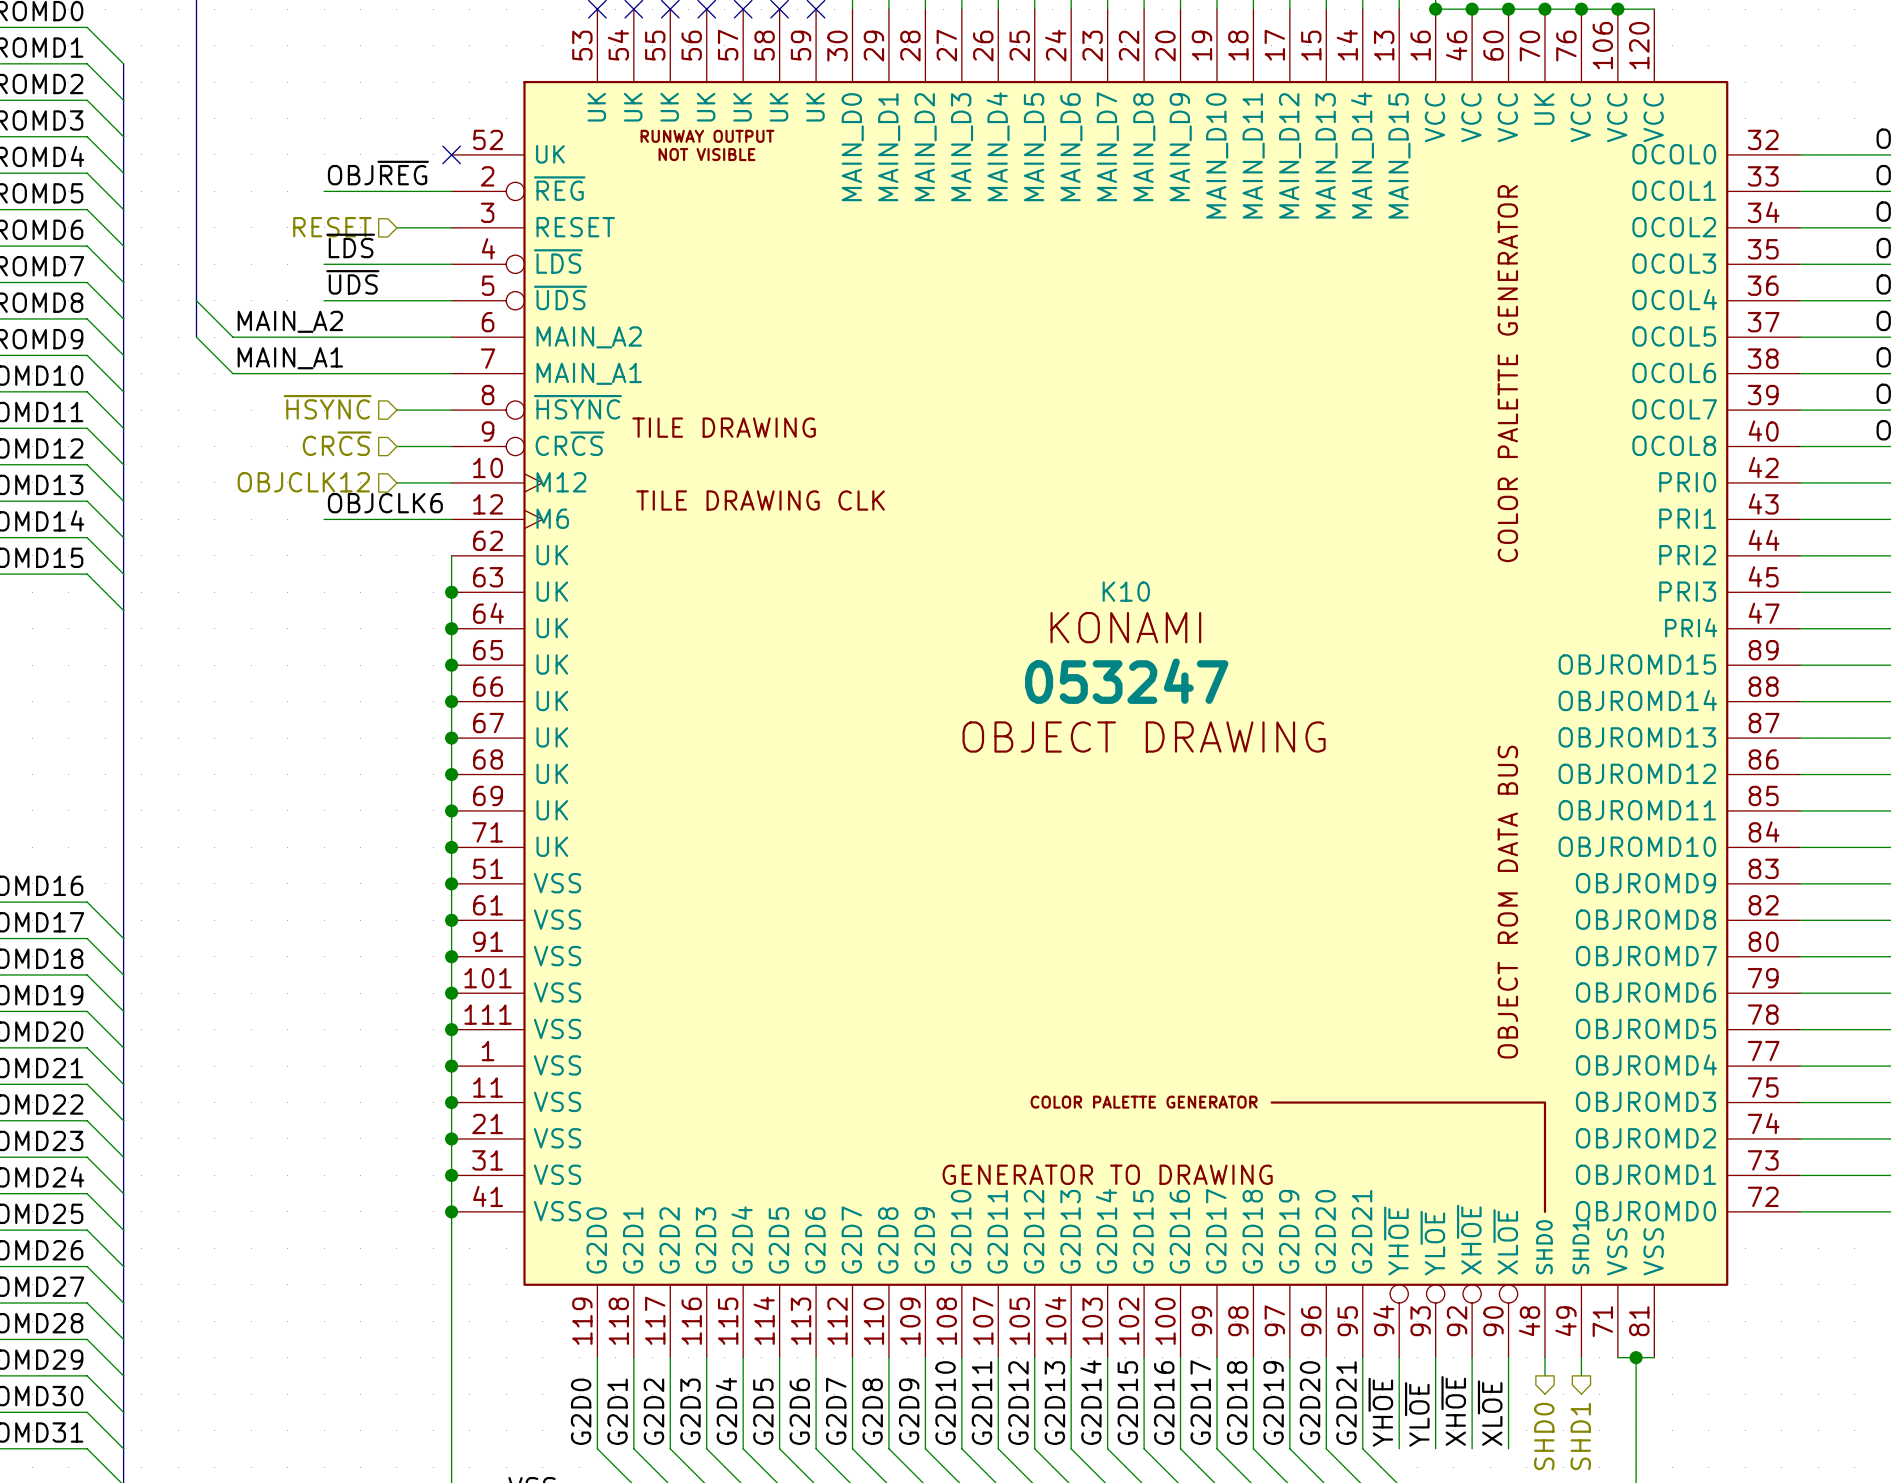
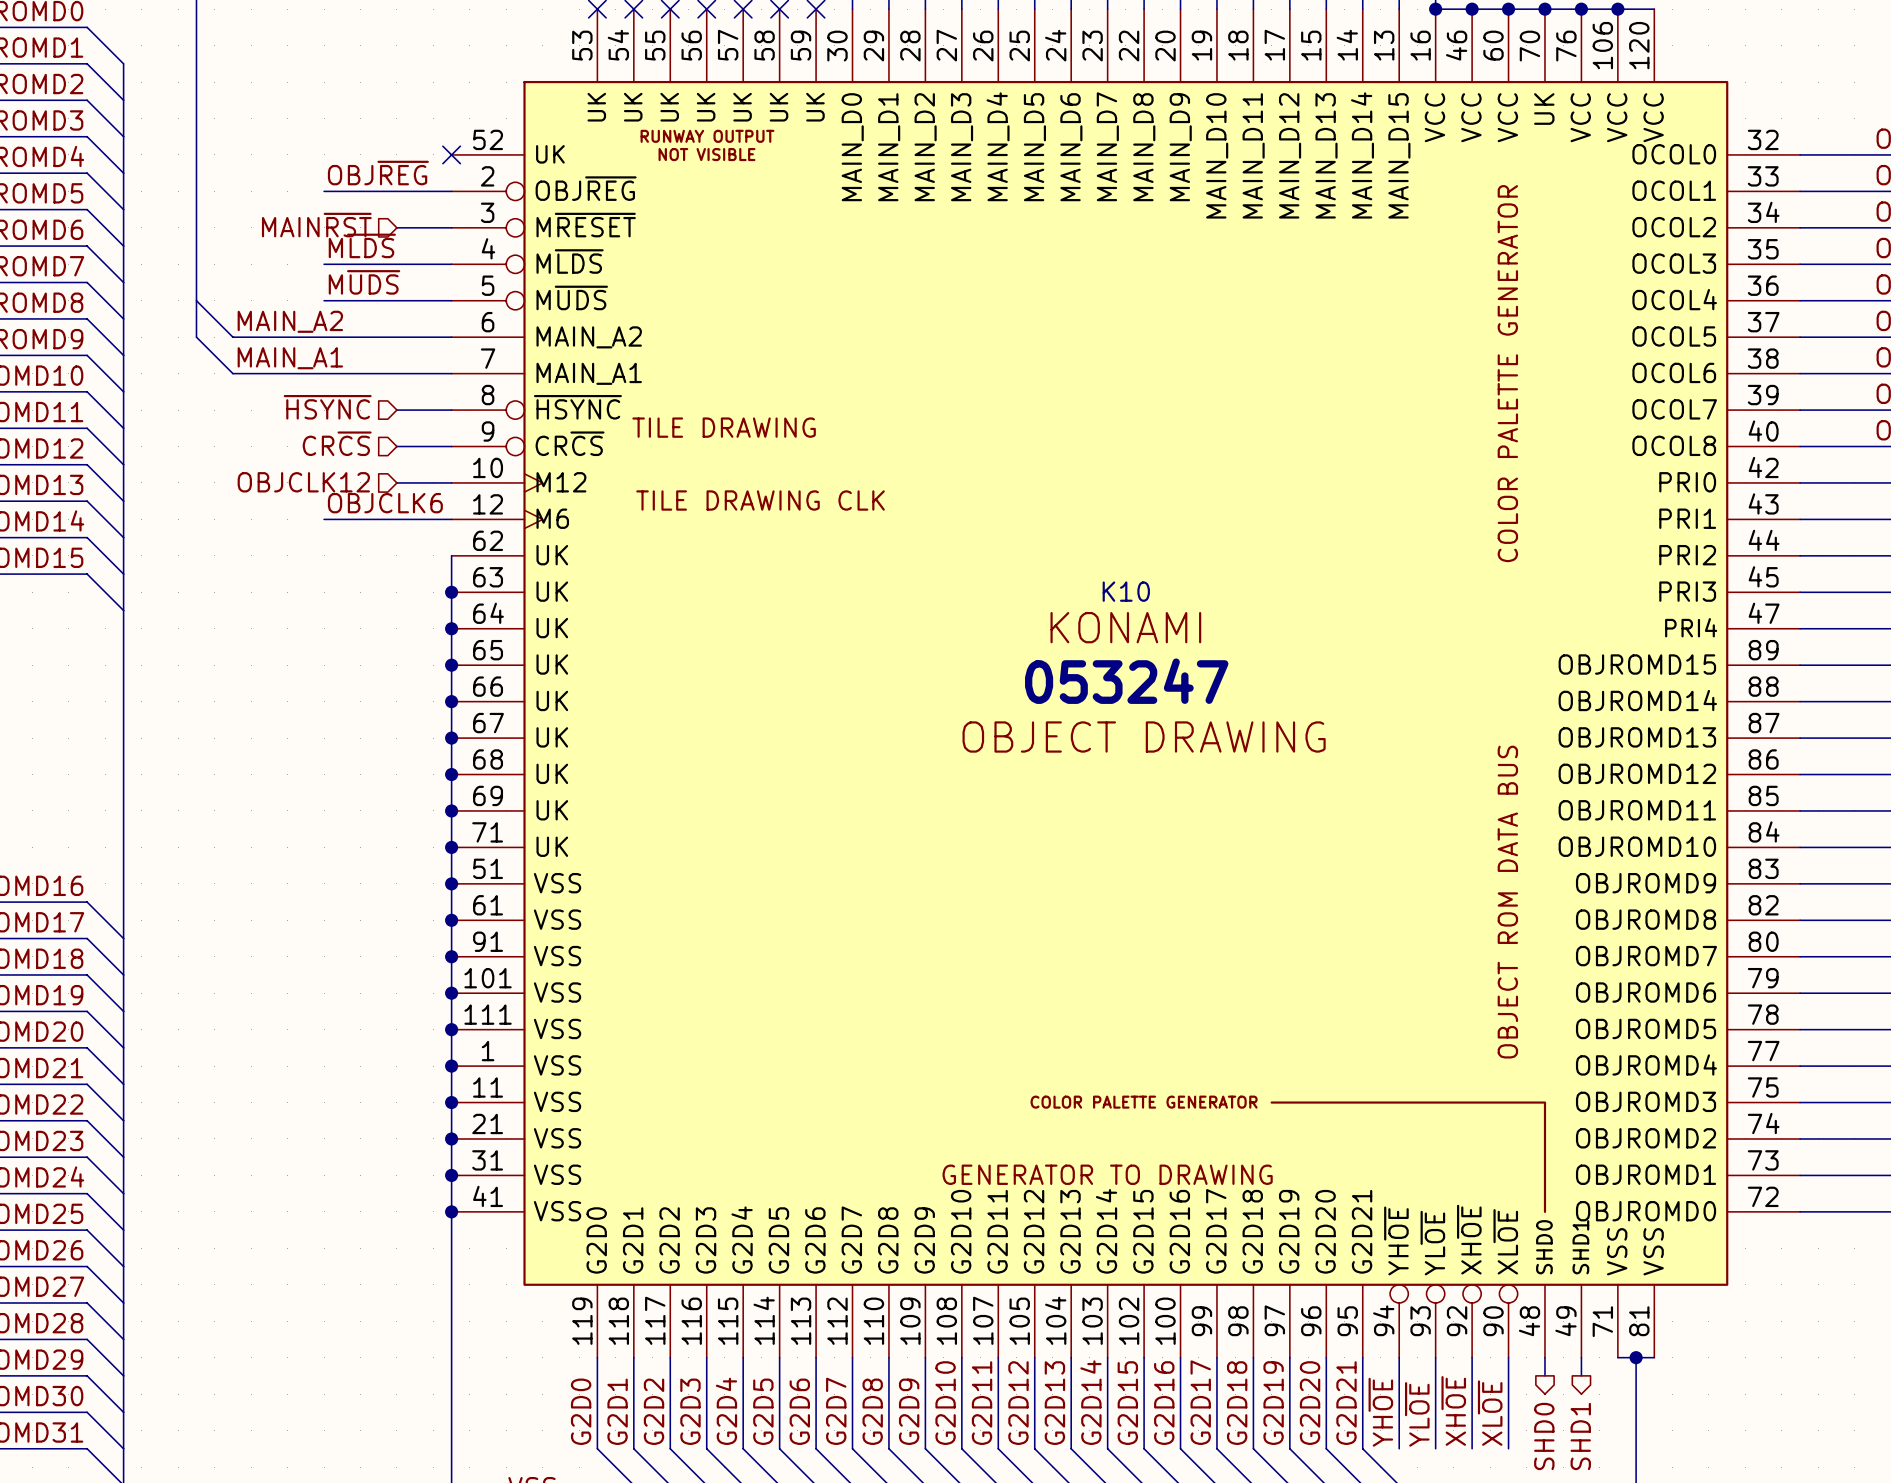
K10 symbol: [451, 9, 1801, 1358] -> [451, 9, 1801, 1358]
hierarchical label: RESET (332, 227) -> MAIN~{RST} (316, 225)
label: ~{LDS} (350, 245) -> M~{LDS} (362, 245)
label: ~{UDS} (352, 282) -> M~{UDS} (364, 282)

